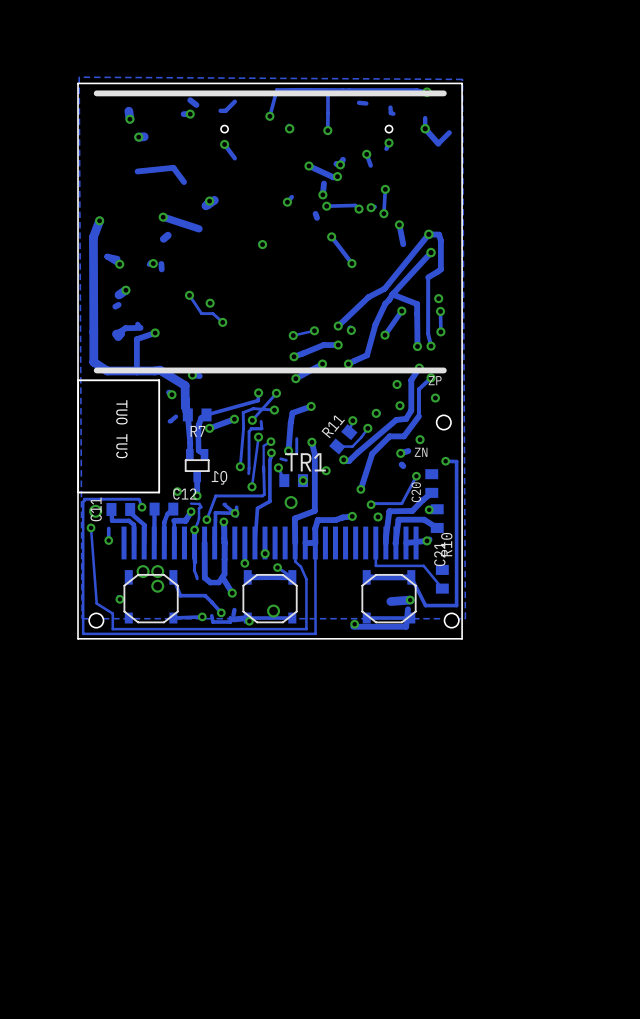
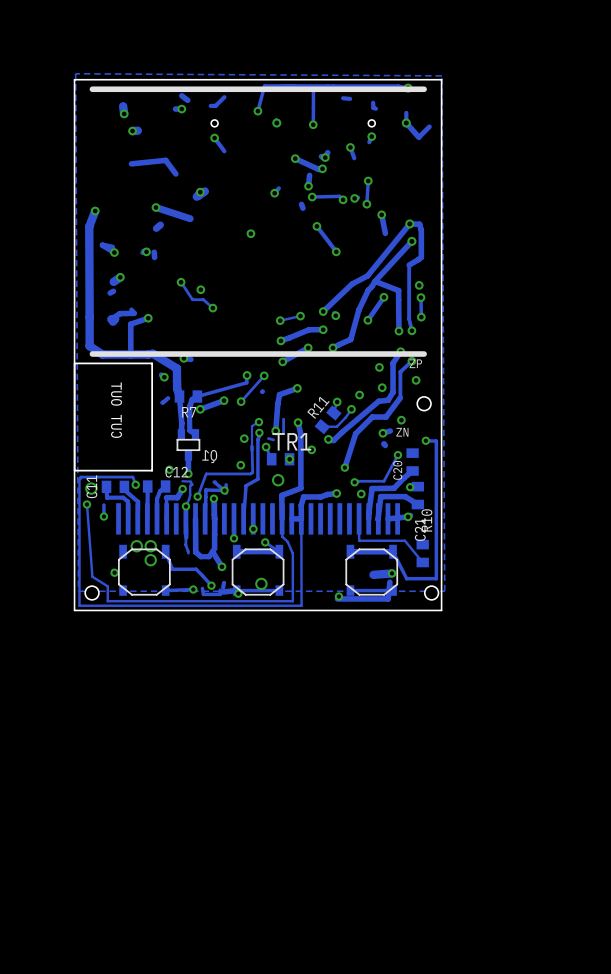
track: (274, 410) (253, 408) (243, 412) (240, 466) -> (262, 391) (262, 391)
via: (274, 410) -> none
track: (261, 421) (261, 428) (251, 428) -> none
track: (251, 428) (249, 431) (248, 473) -> none
track: (258, 437) (251, 486) -> none
via: (258, 437) -> none
via: none -> (244, 438)
via: (240, 466) -> none

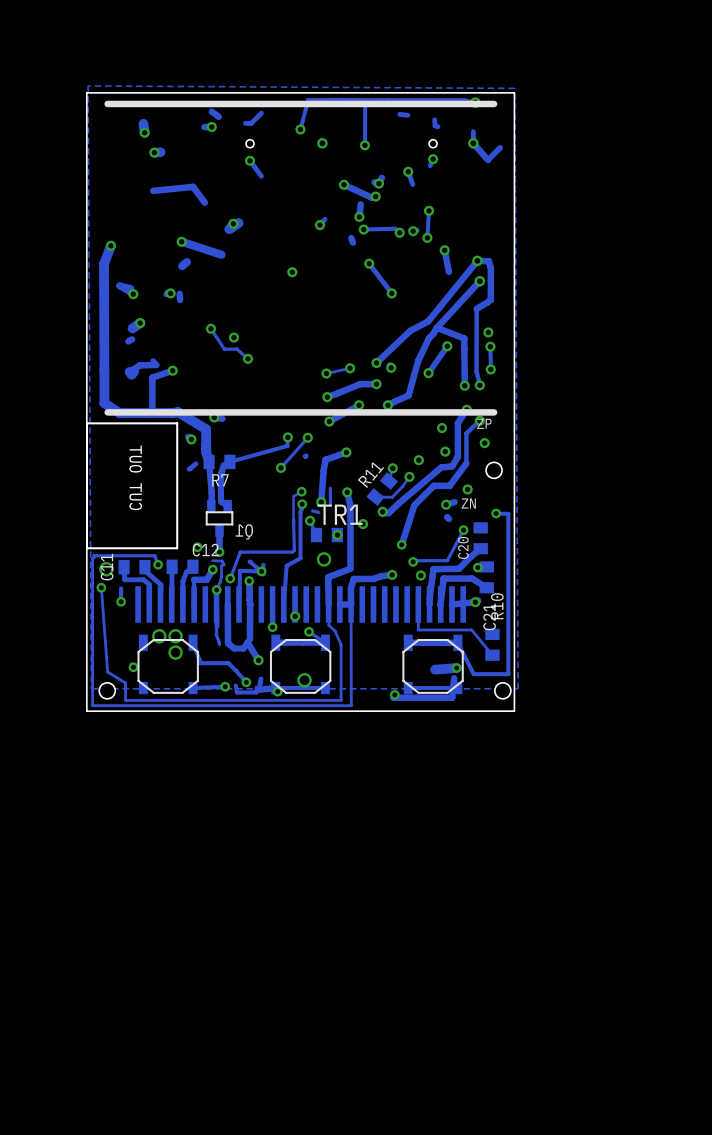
track: (224, 400) (200, 409) -> none
via: (224, 400) -> none
via: (200, 409) -> none
via: (244, 438) -> none
via: (240, 465) -> none

